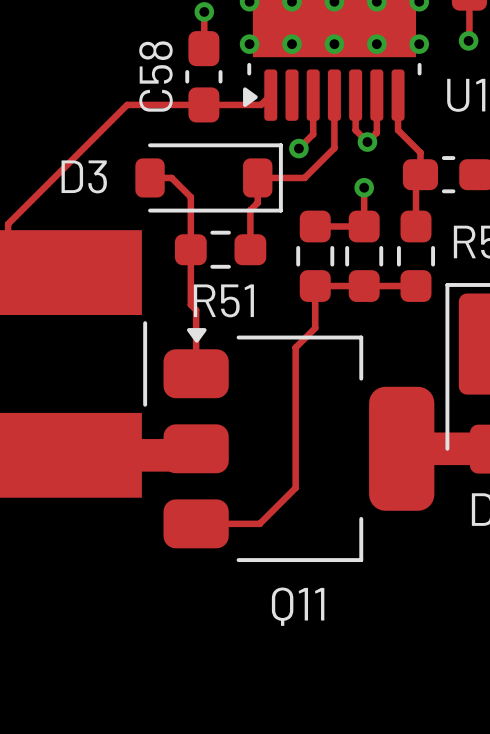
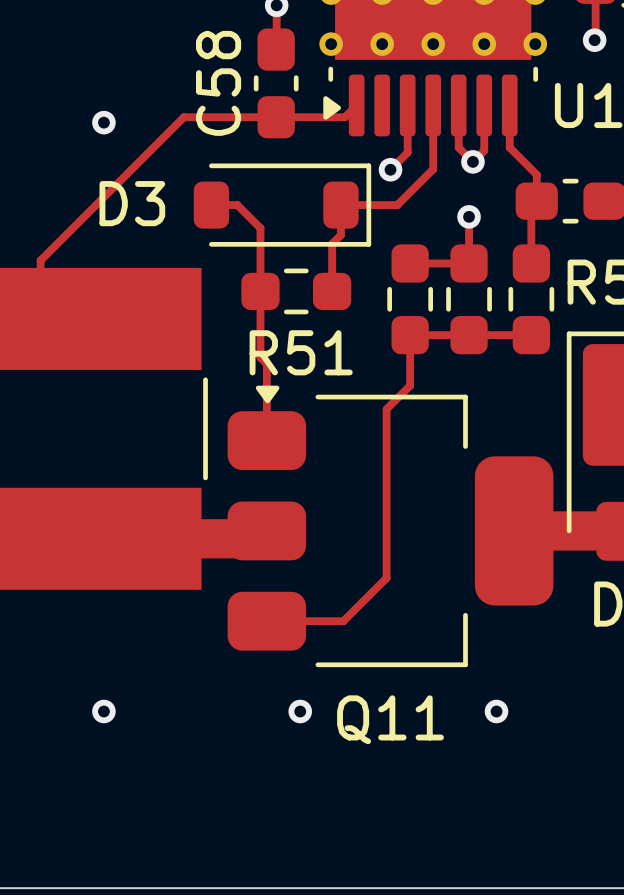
via: none -> (103, 122)
via: none -> (103, 711)
via: none -> (300, 711)
via: none -> (496, 711)

